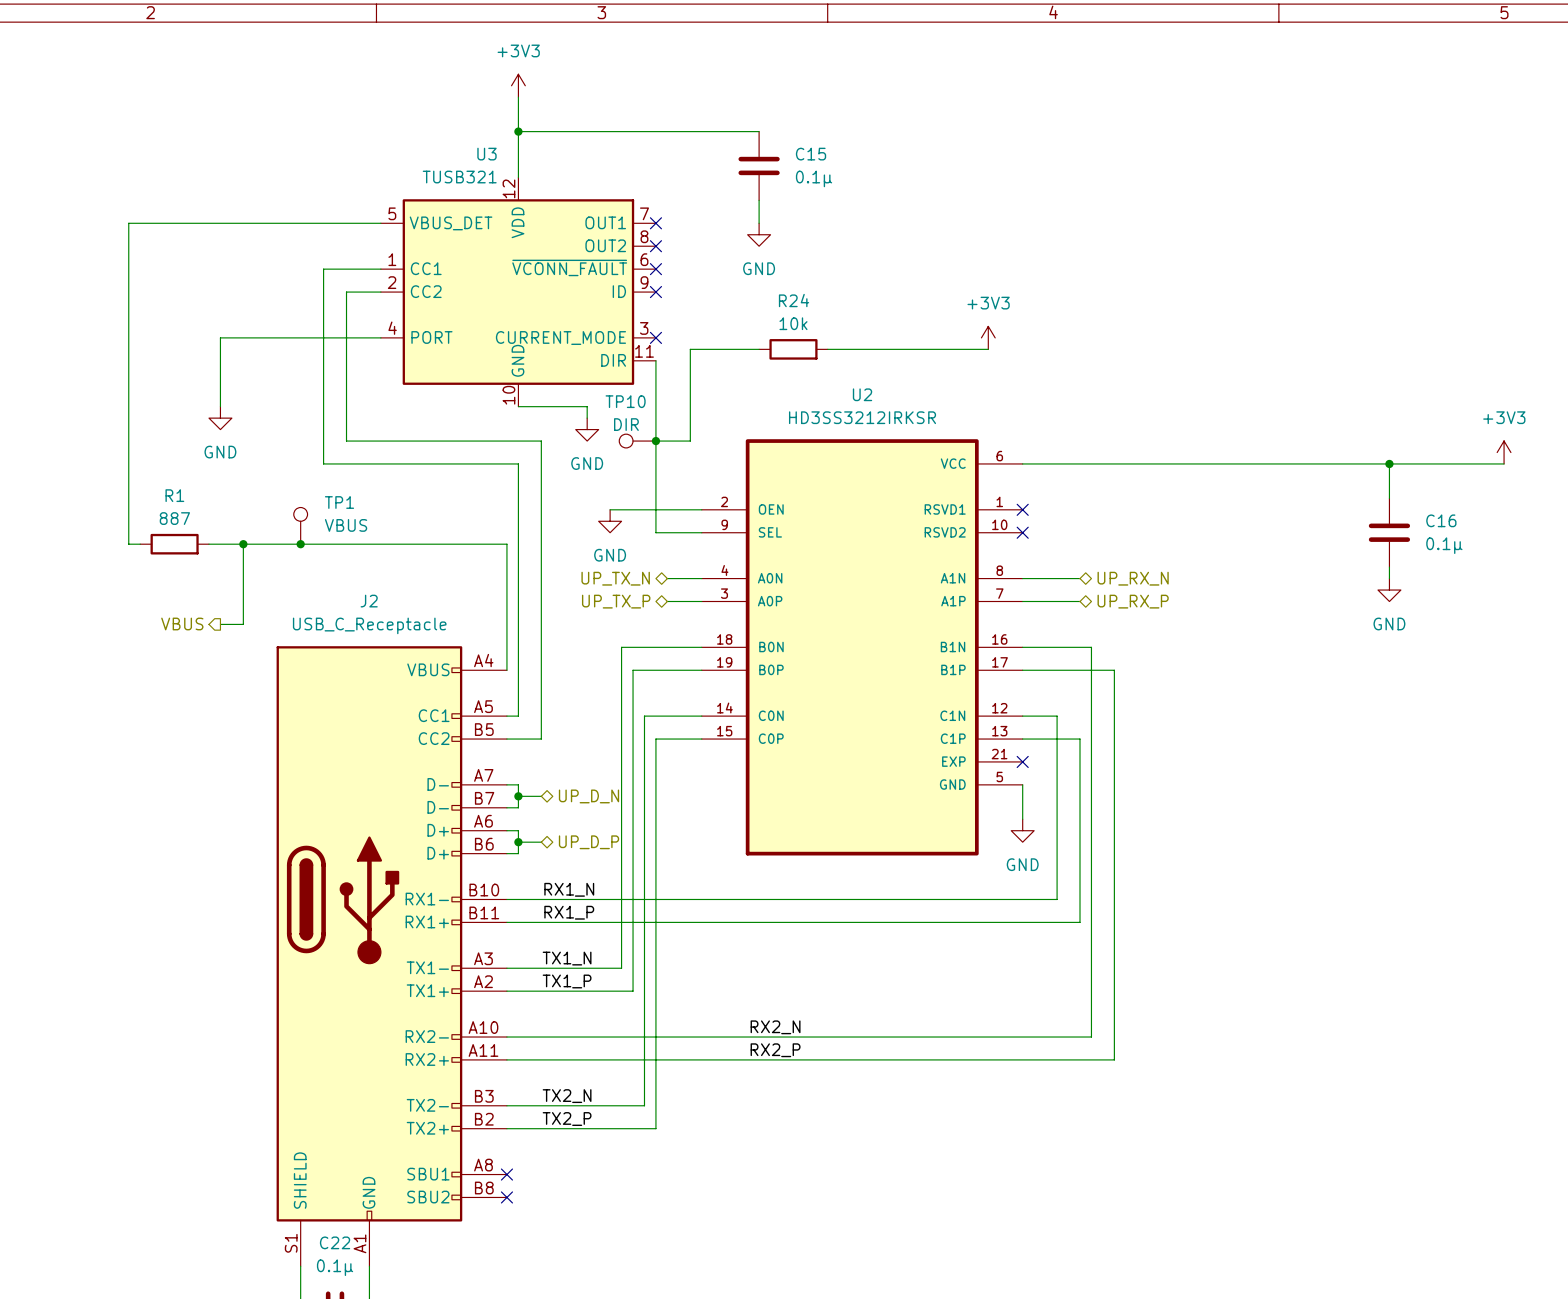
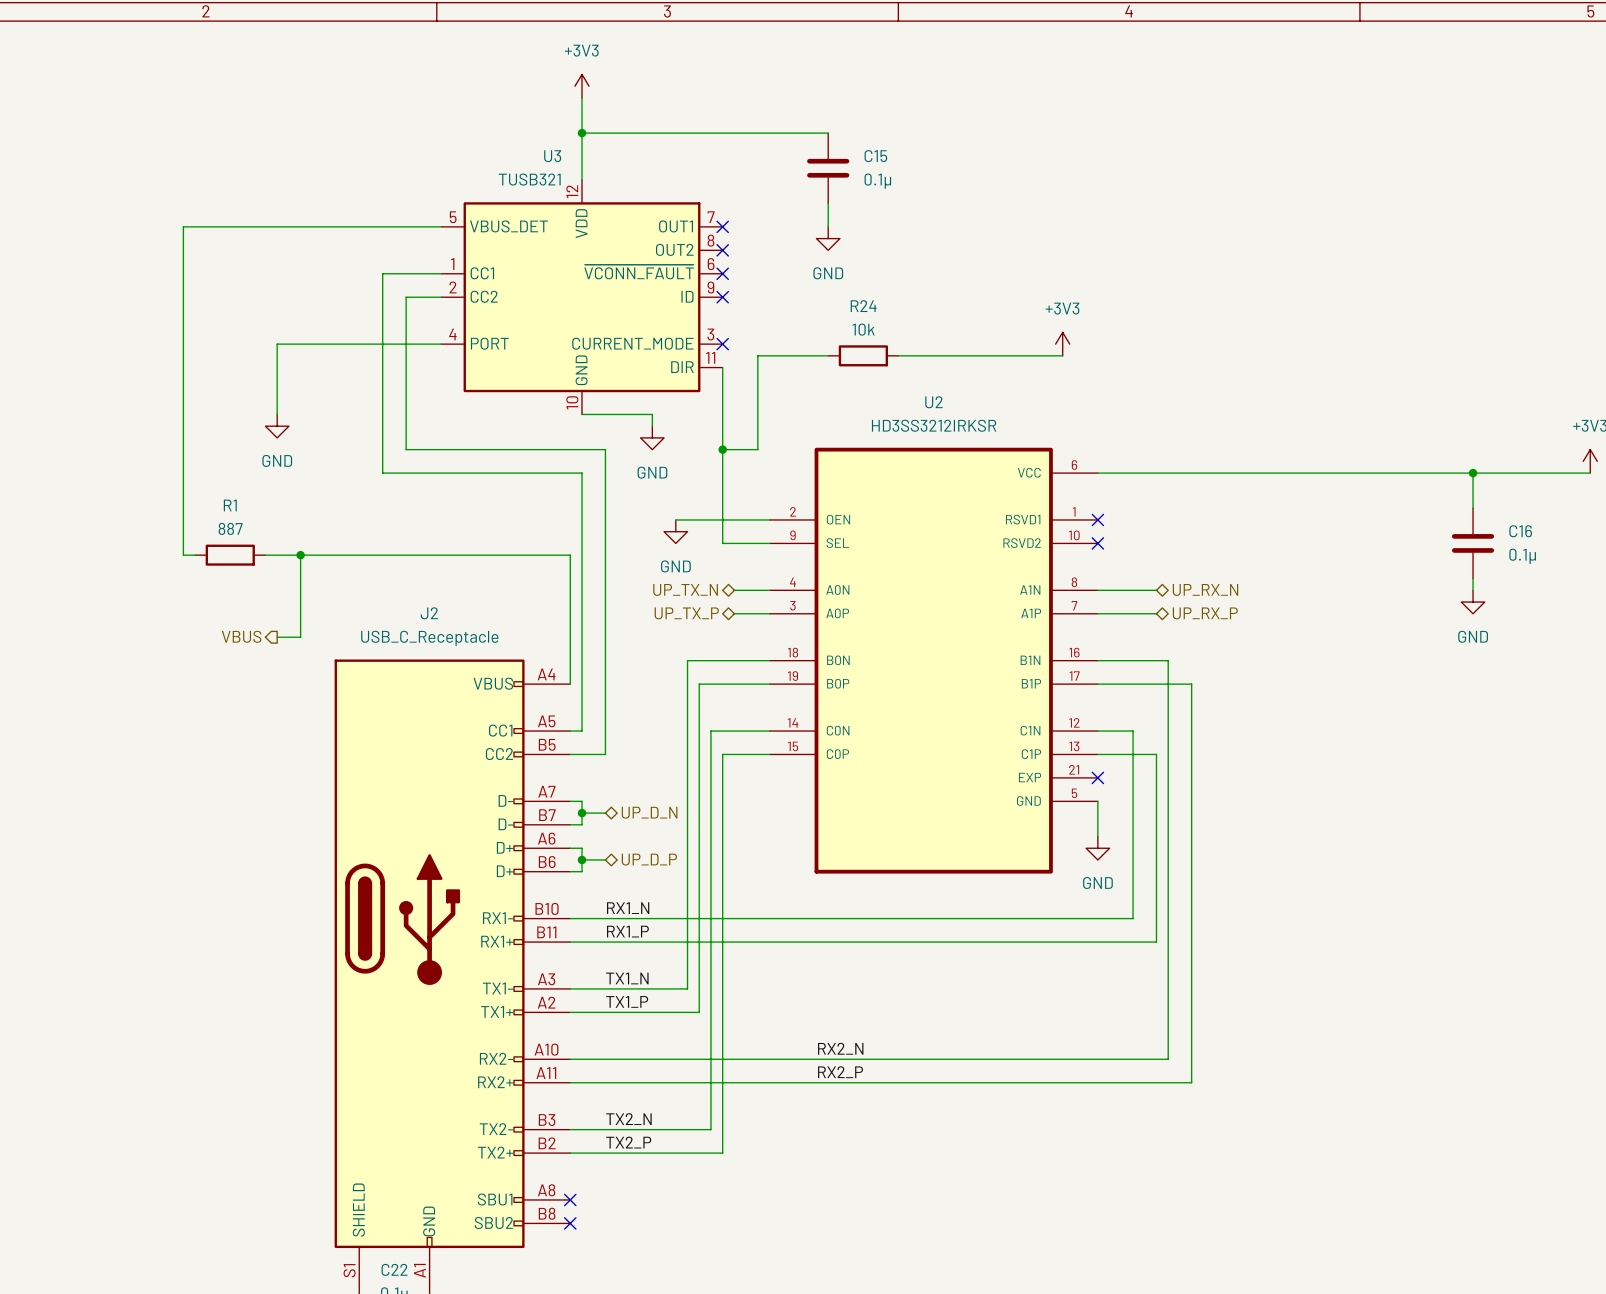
TP10: DIR (637, 441) -> none
TP1: VBUS (300, 525) -> none
junction: (300, 544) -> none

